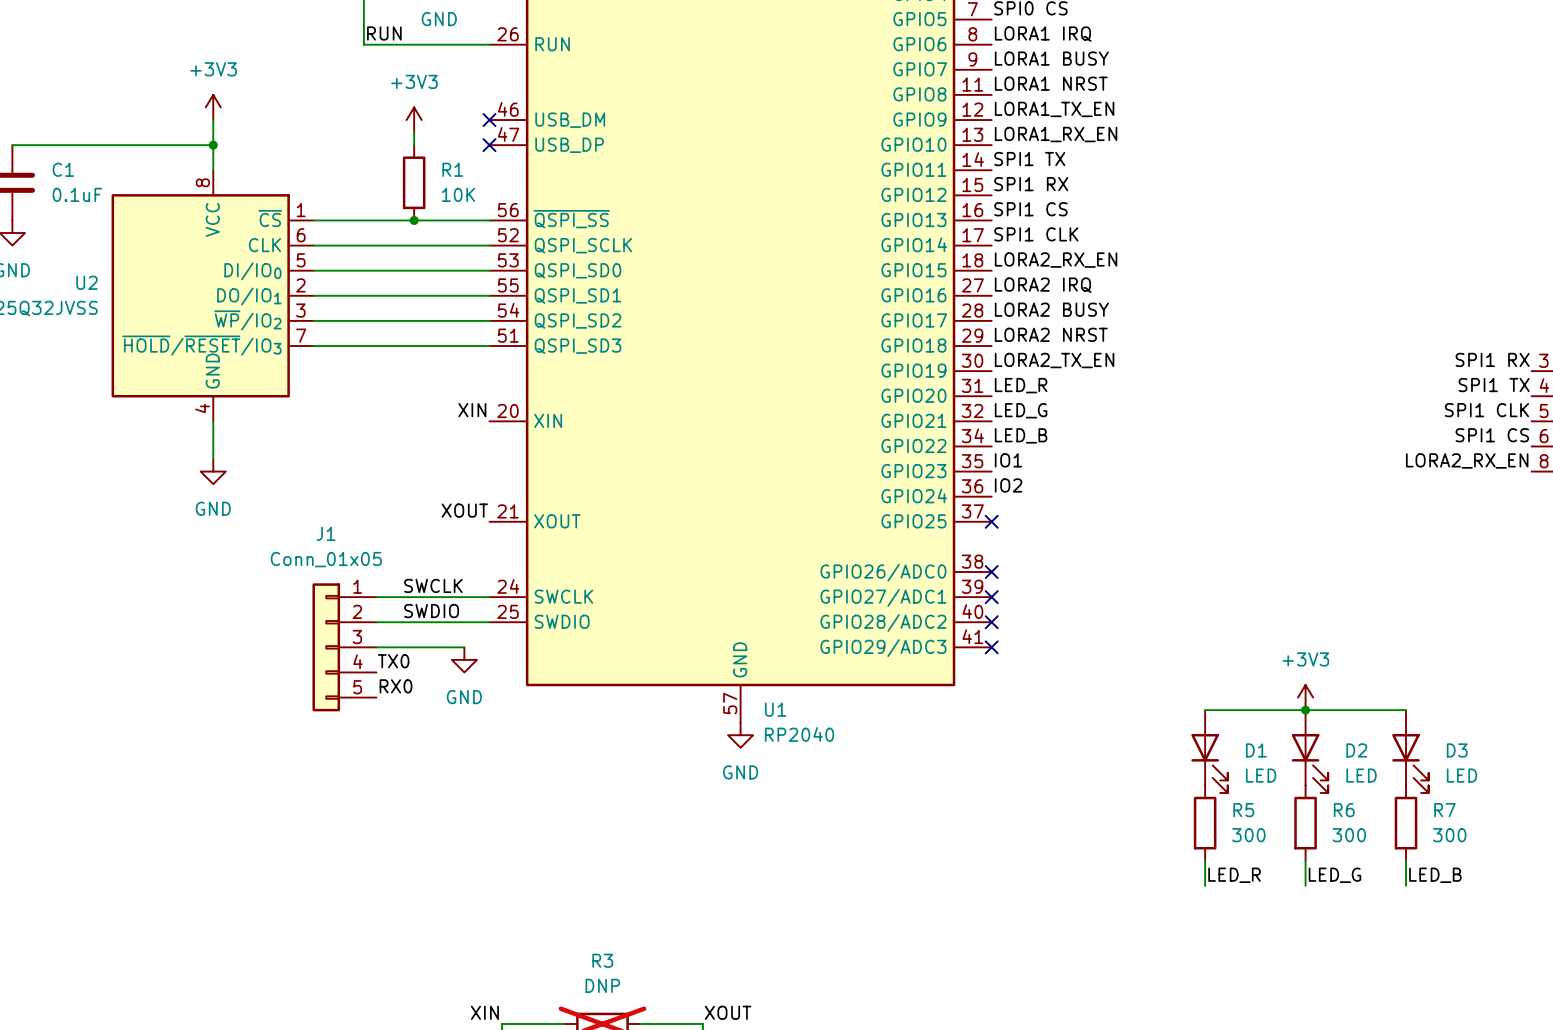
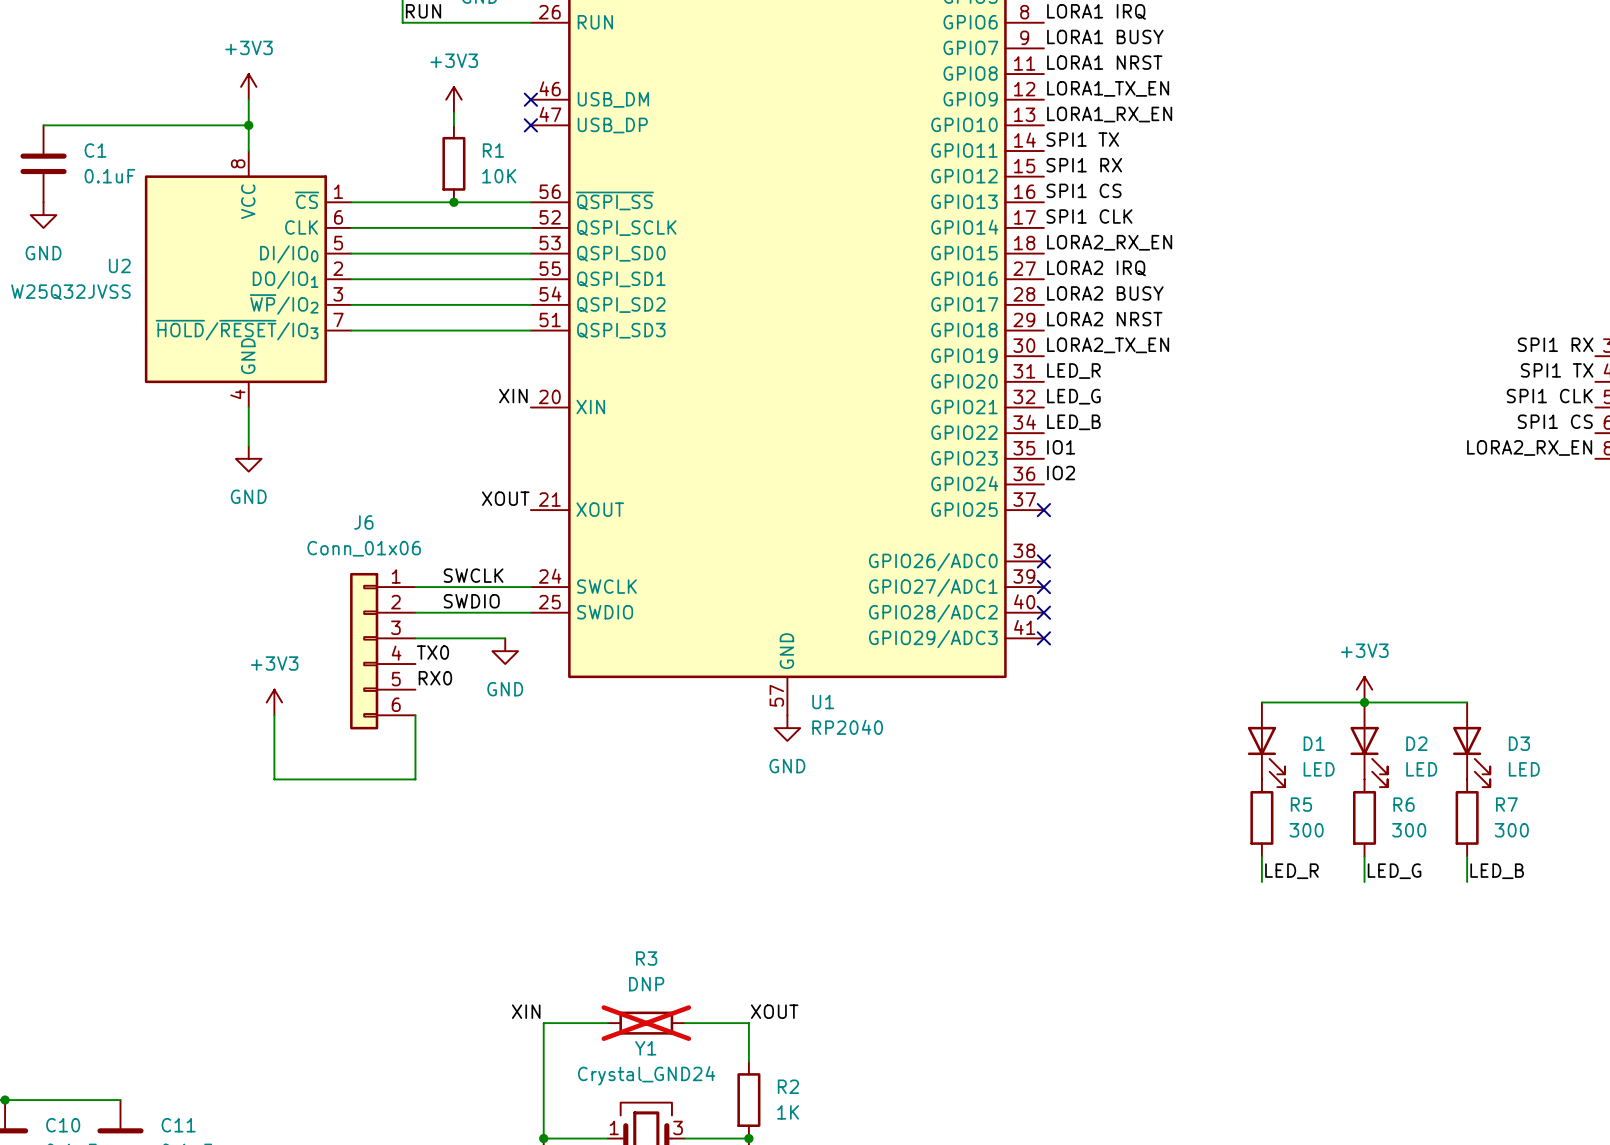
J1: Conn_01x05 (344, 647) -> none
J6: none -> Conn_01x06 (382, 651)
power symbol: none -> +3V3 (274, 702)
wire: none -> (274, 715) (274, 779) (415, 779) (415, 715)

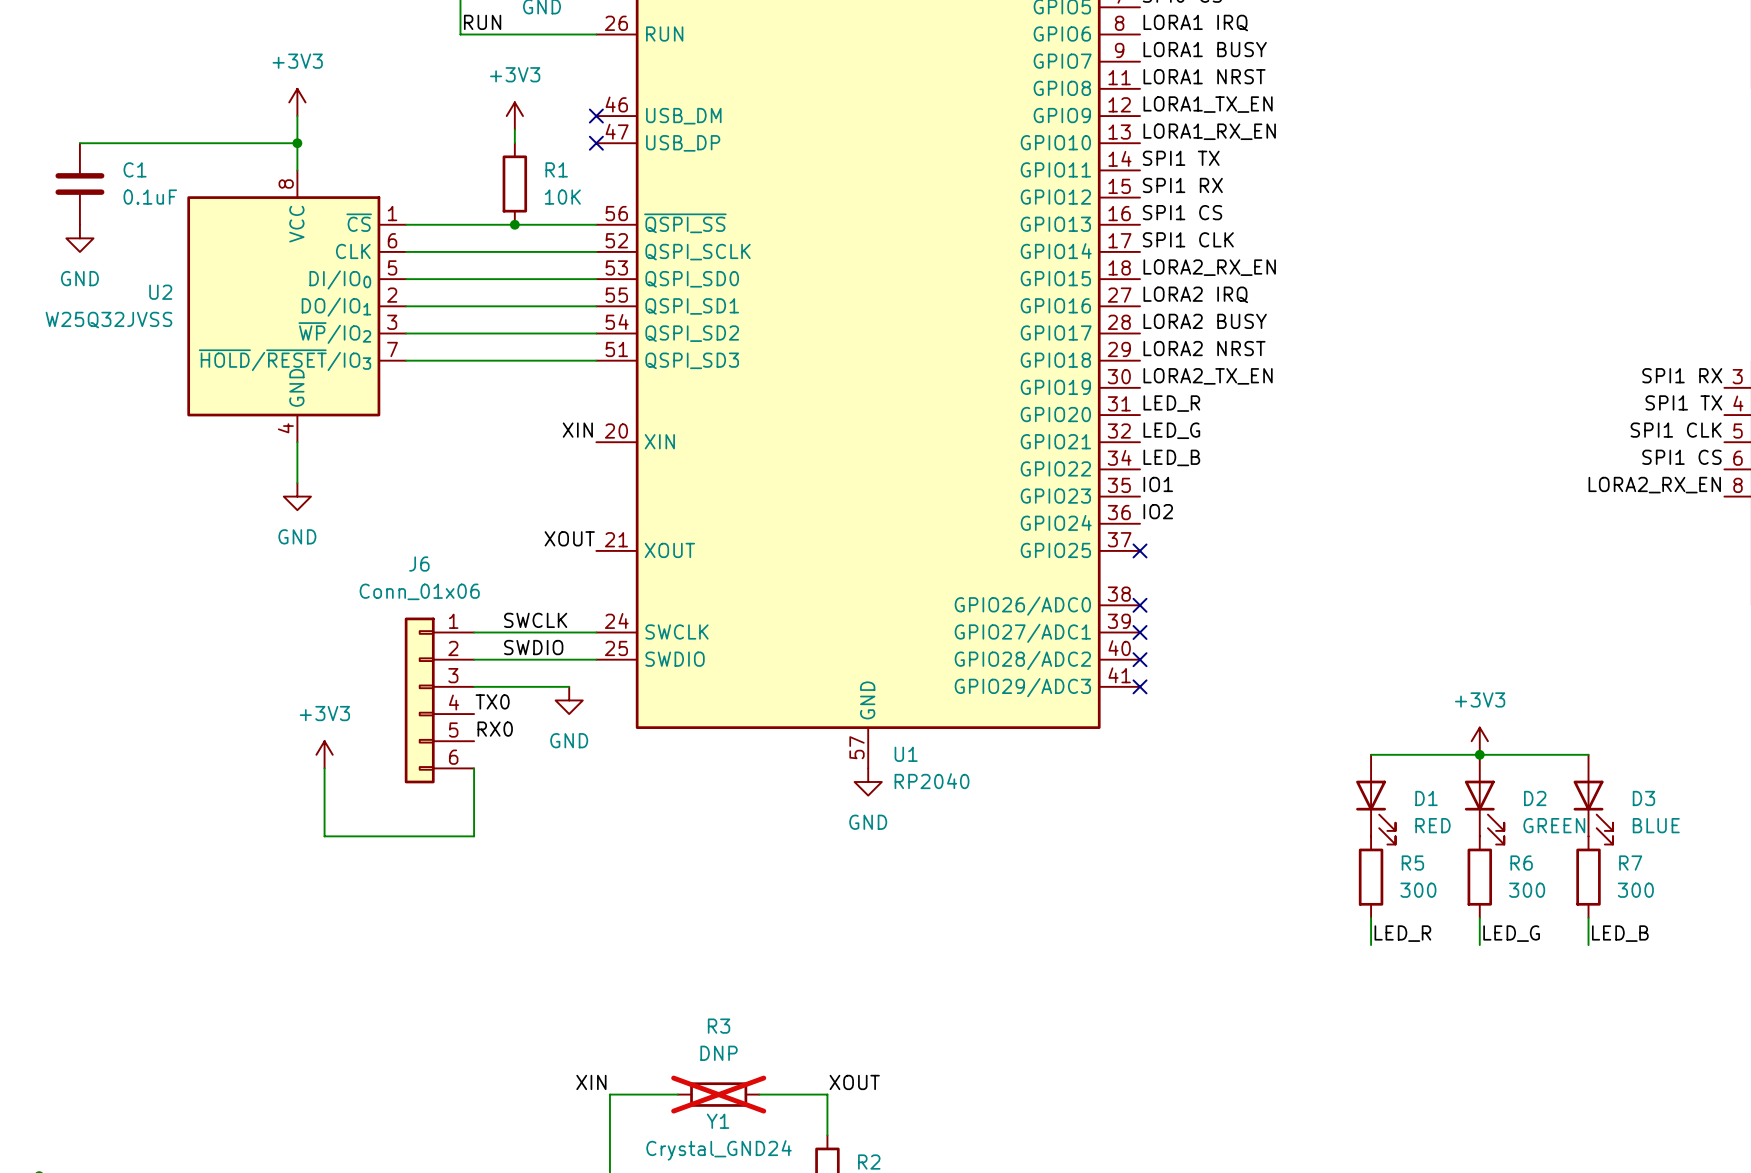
D1 value: LED (1319, 769) -> RED (1432, 825)
D2 value: LED (1421, 769) -> GREEN (1554, 825)
D3 value: LED (1524, 769) -> BLUE (1656, 825)

